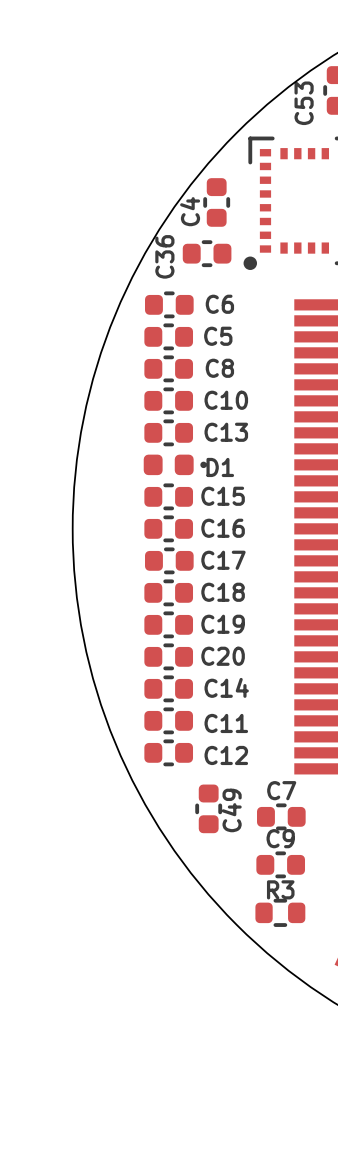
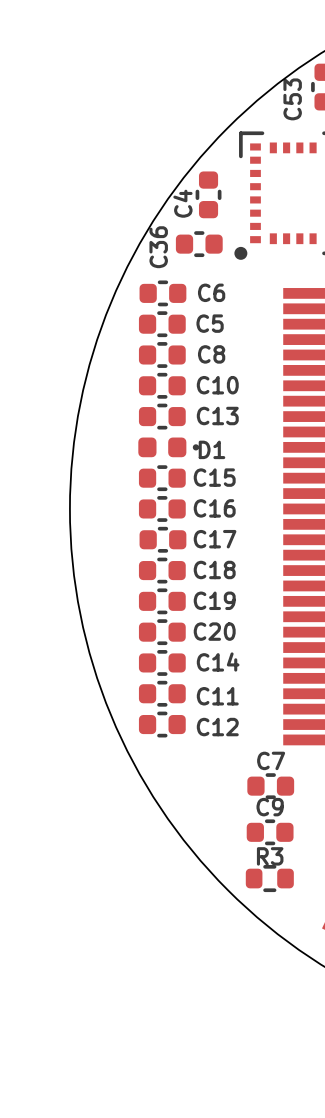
C49: (208, 808) -> none

